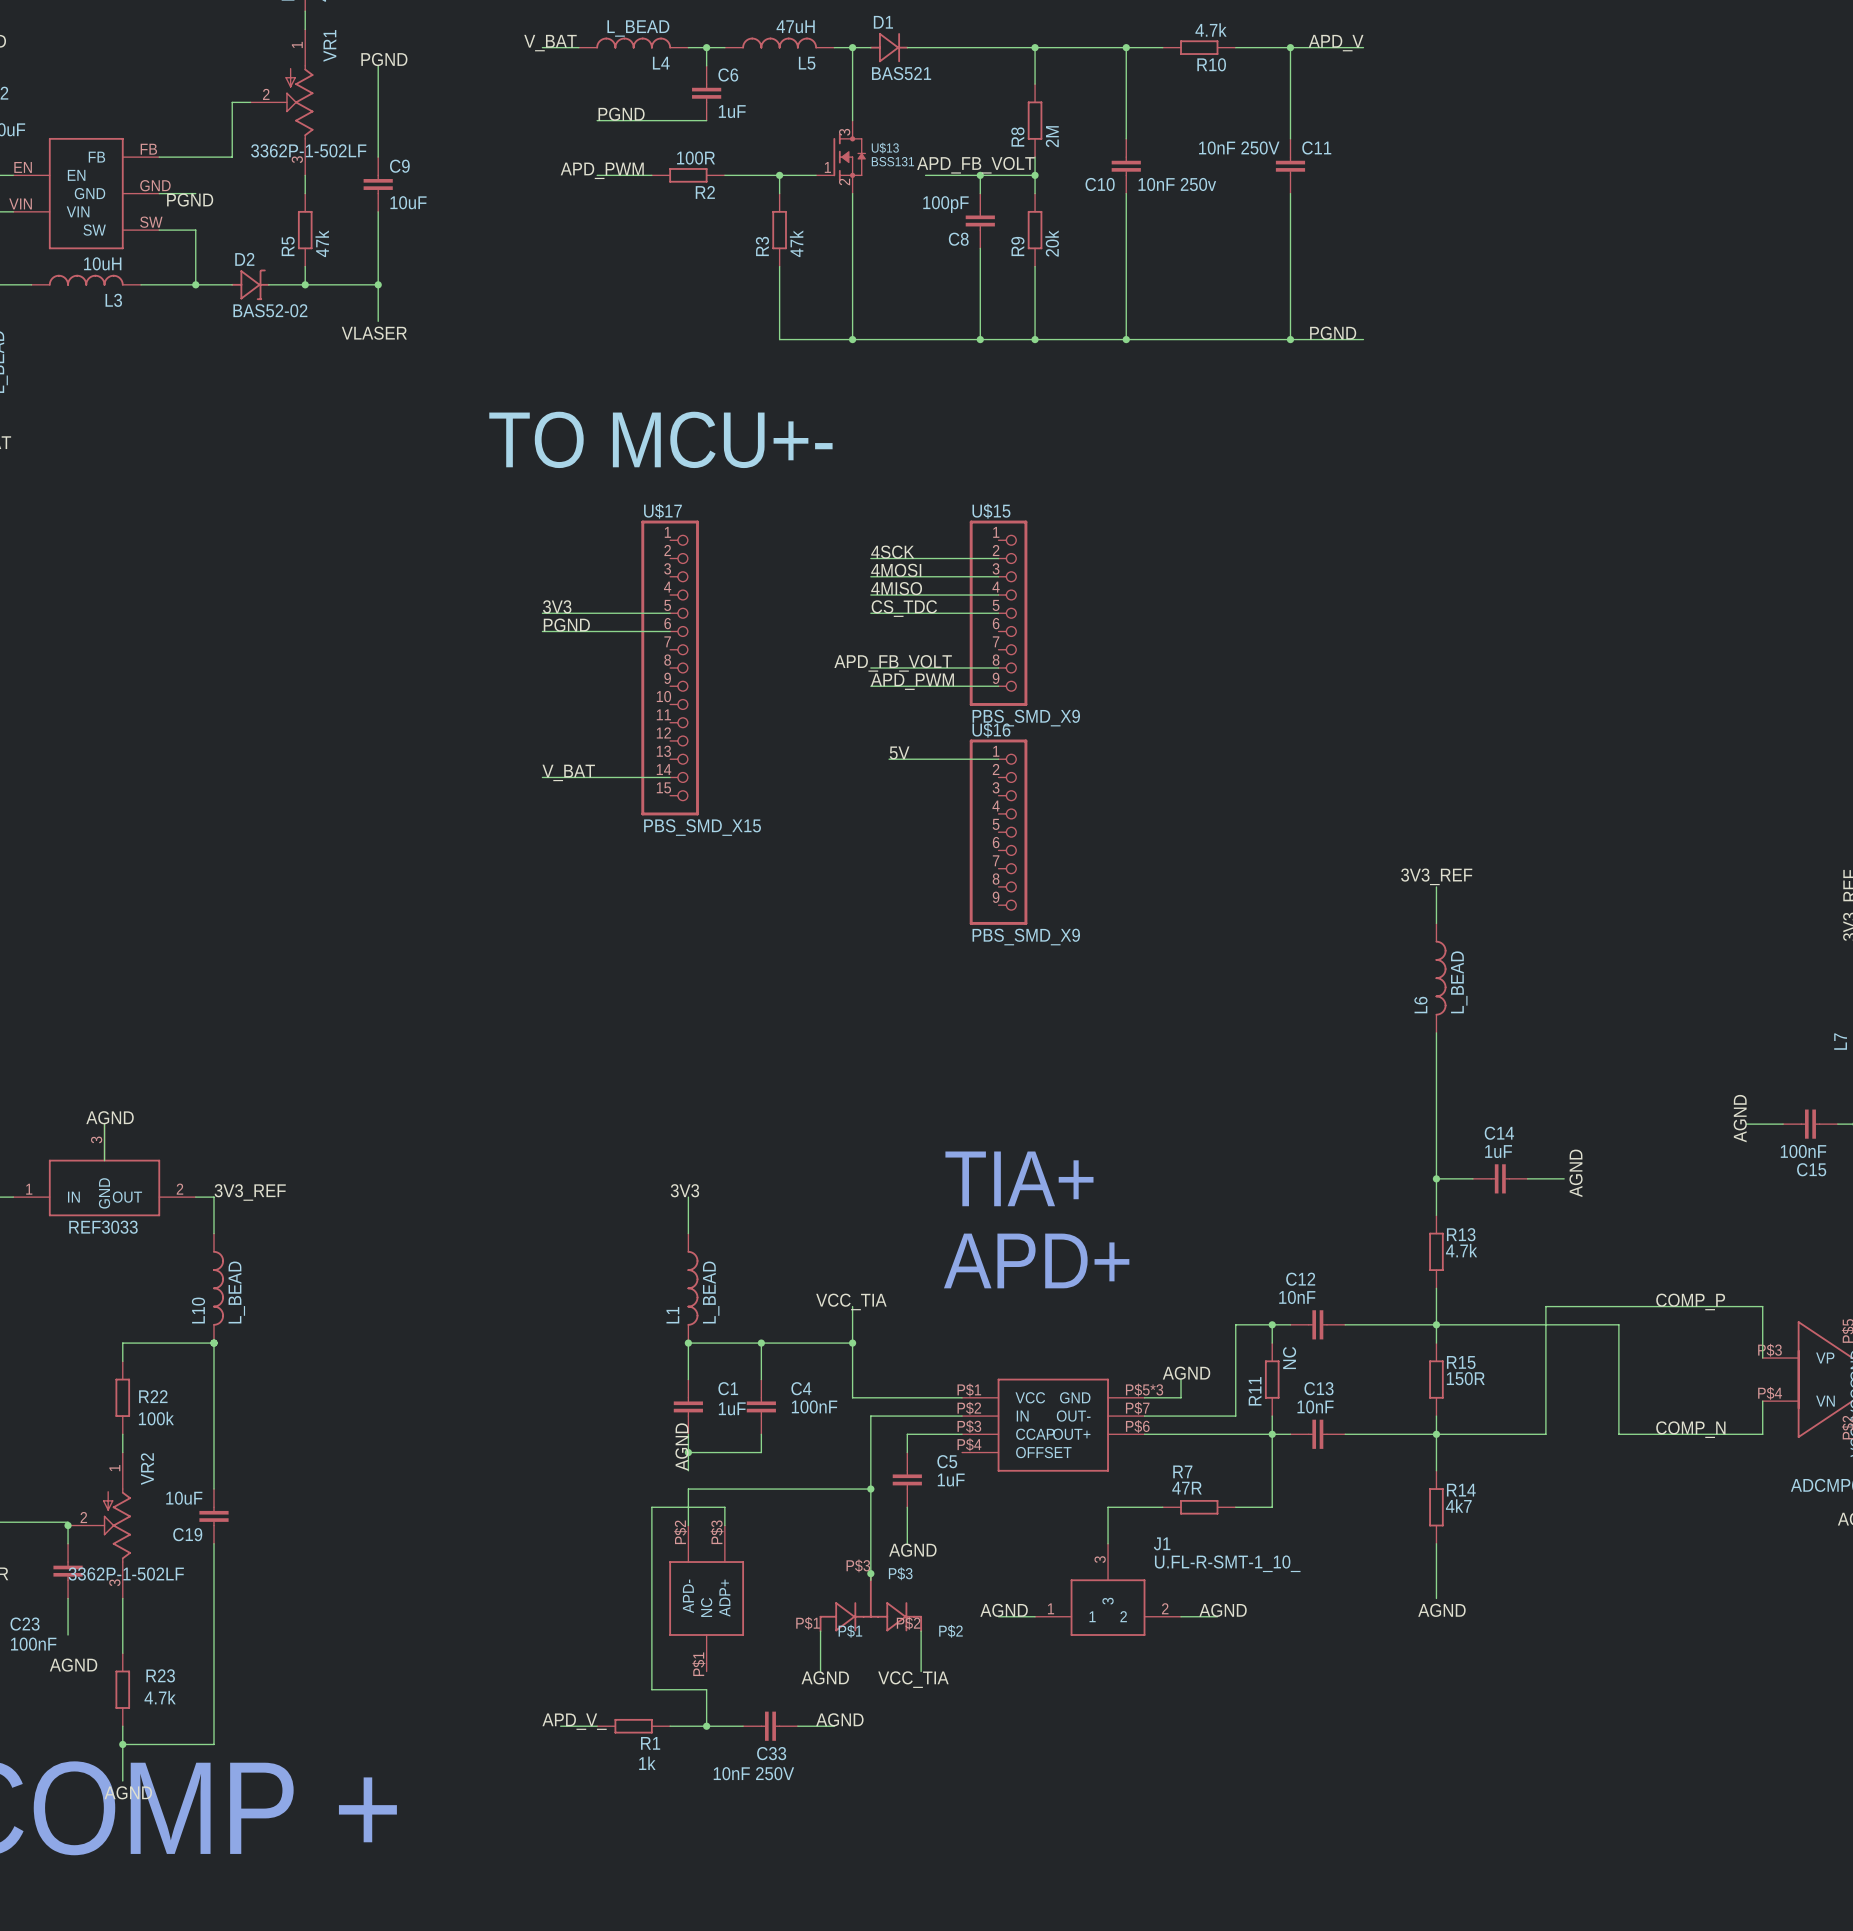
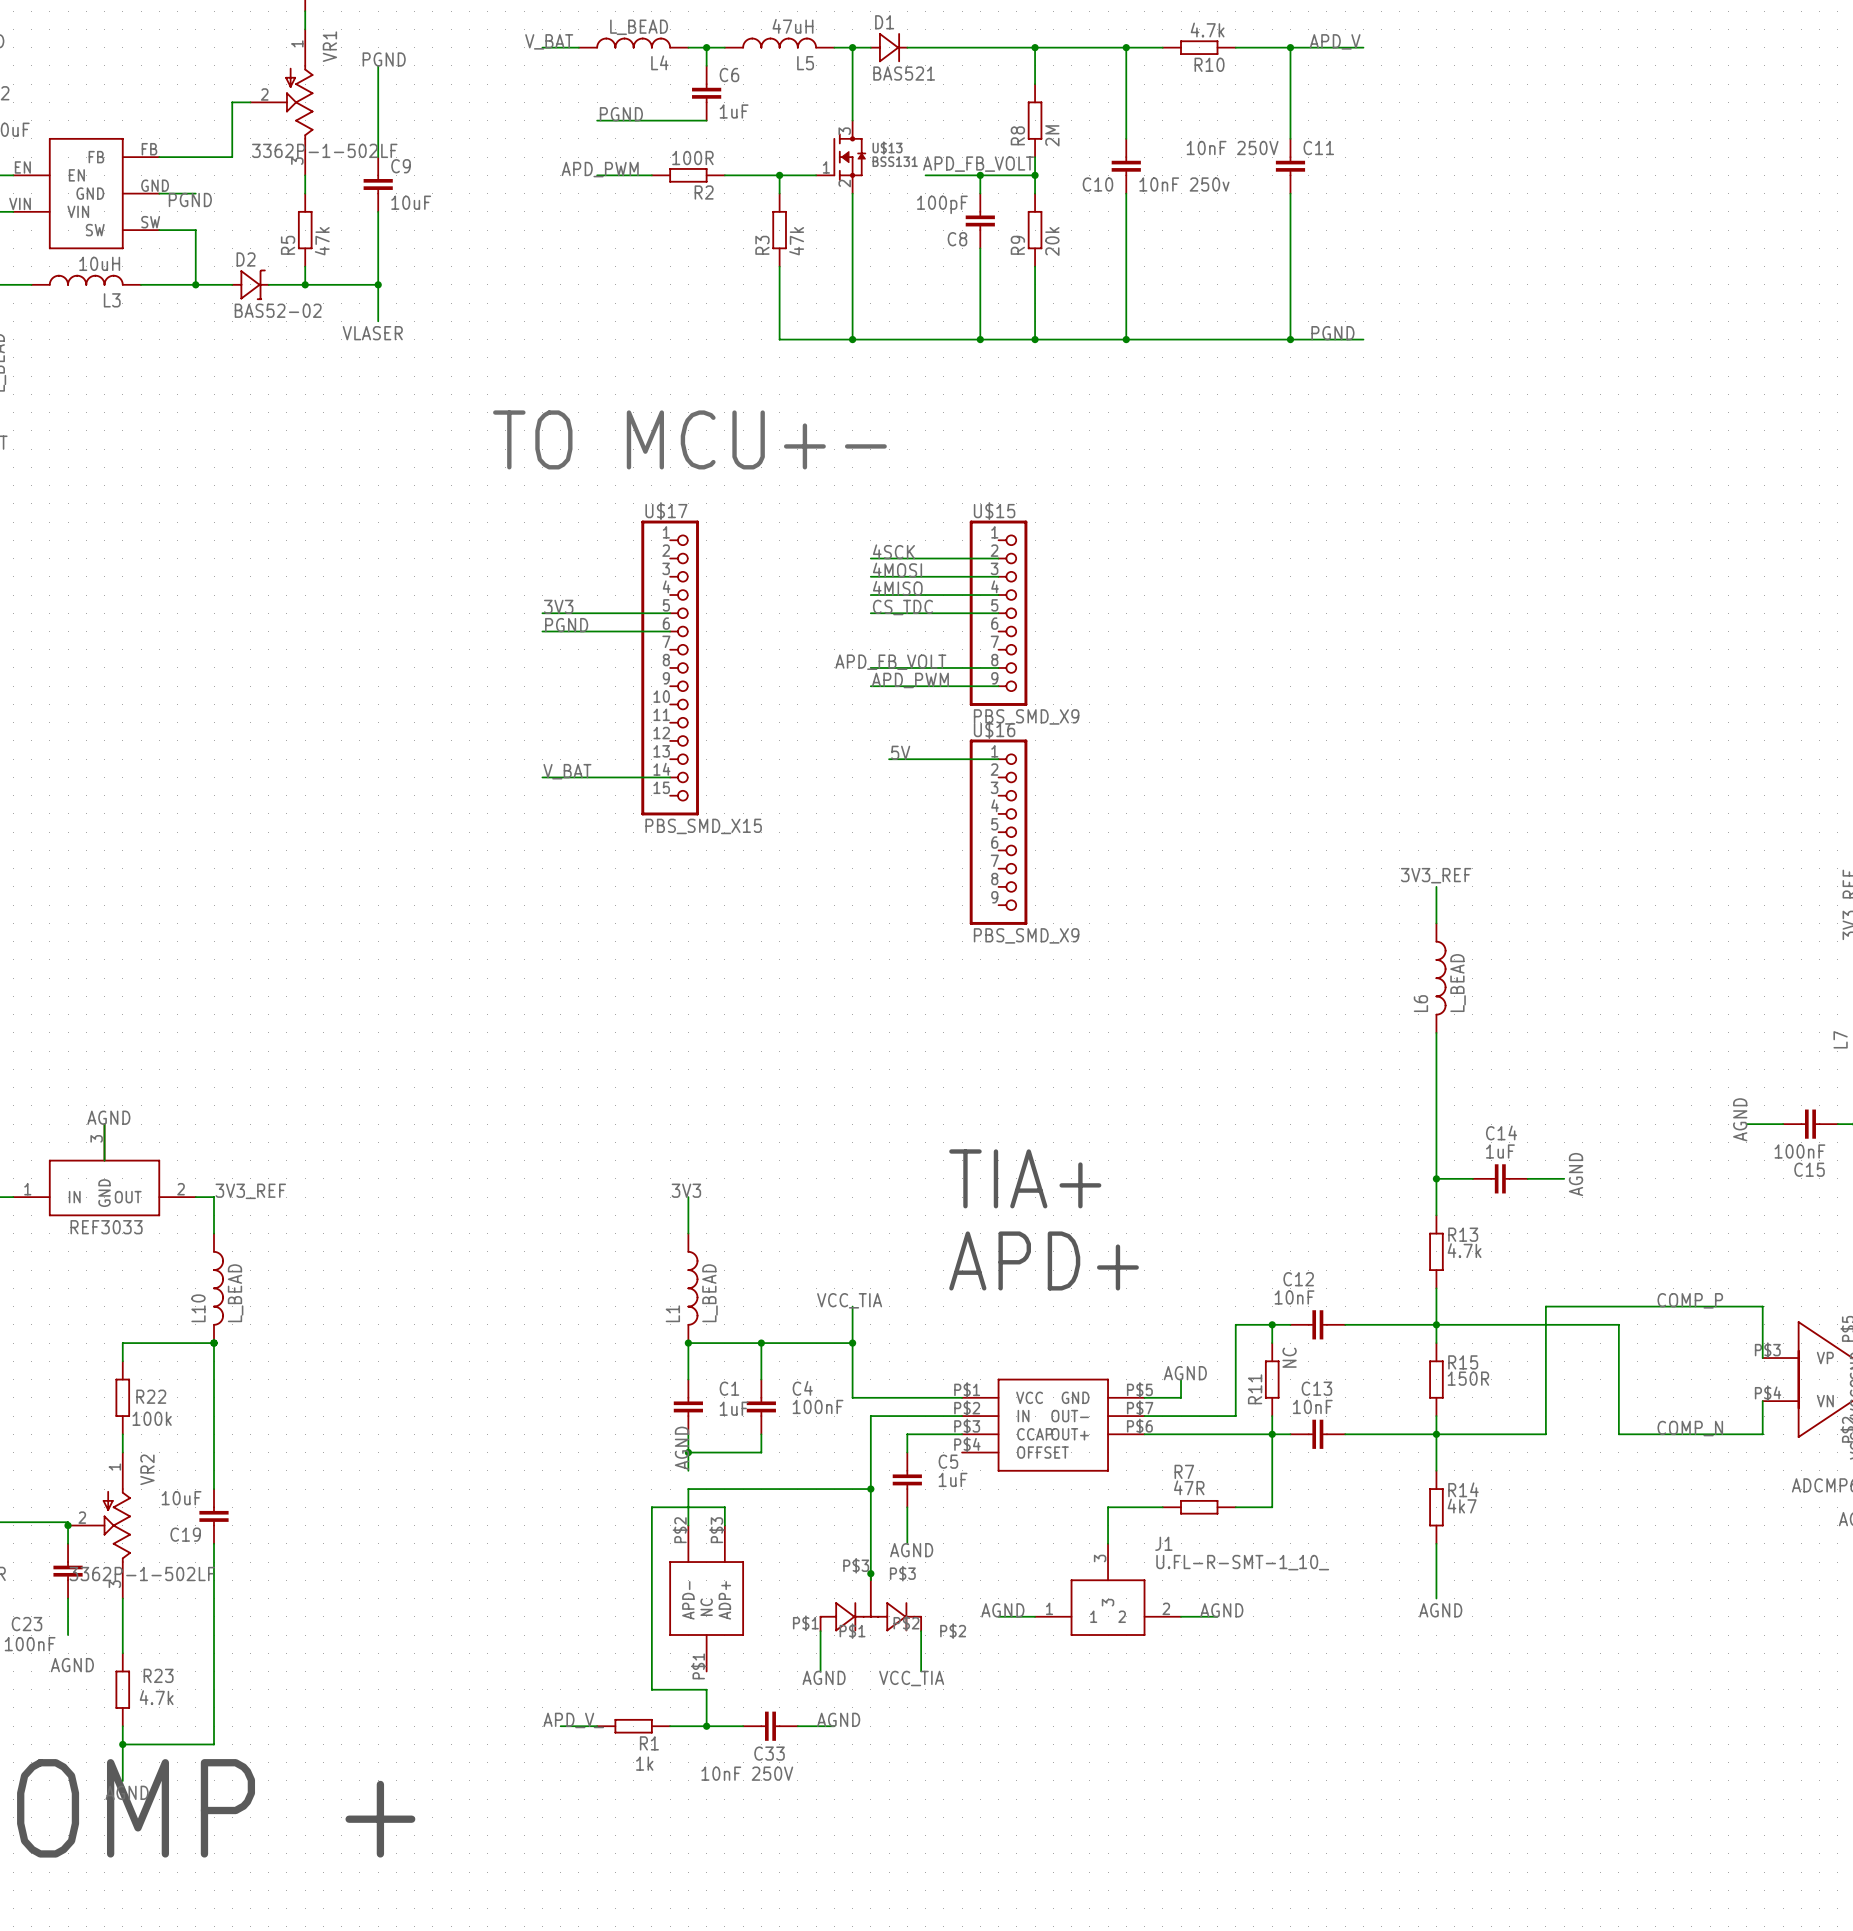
part pin number: P$5*3 (1144, 1390) -> P$5 (1139, 1389)

